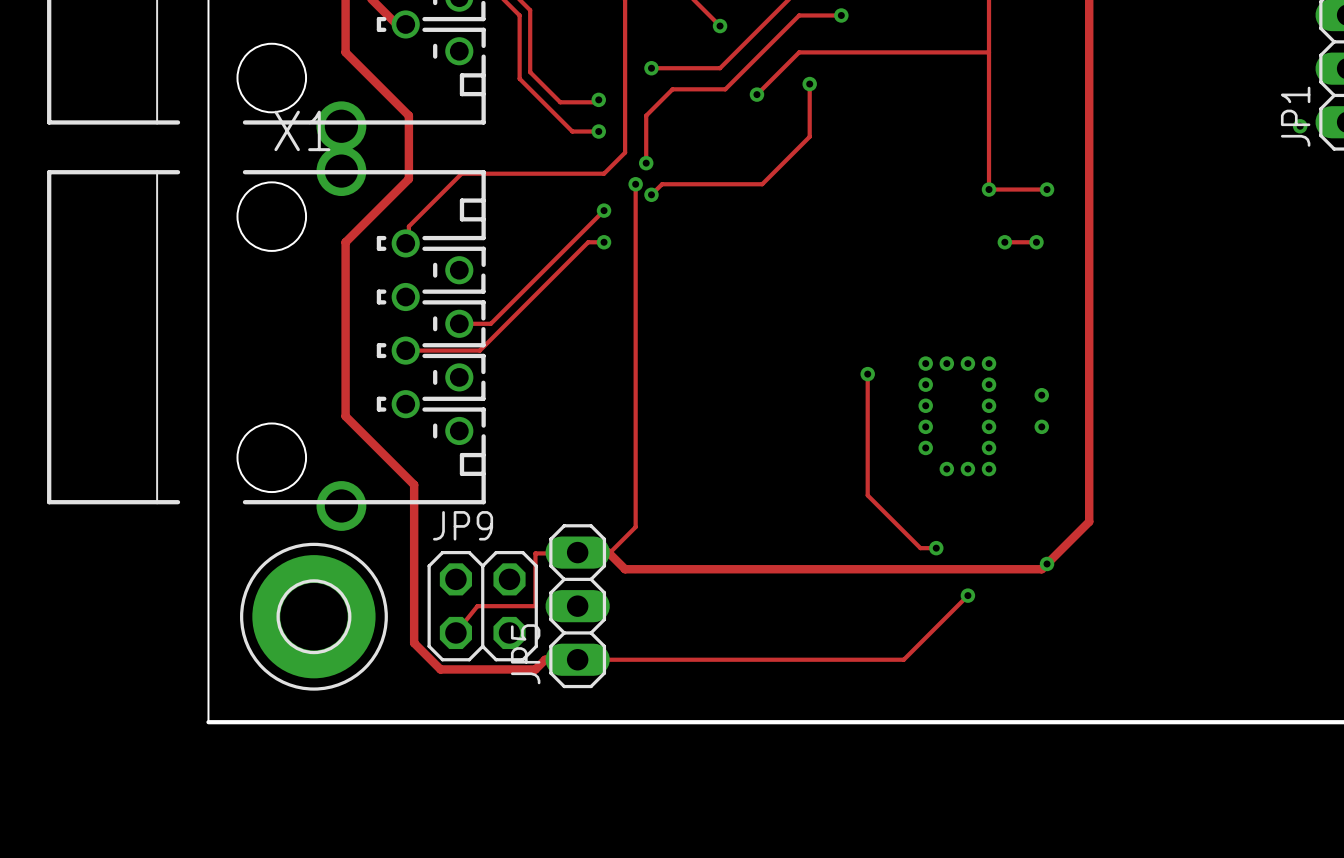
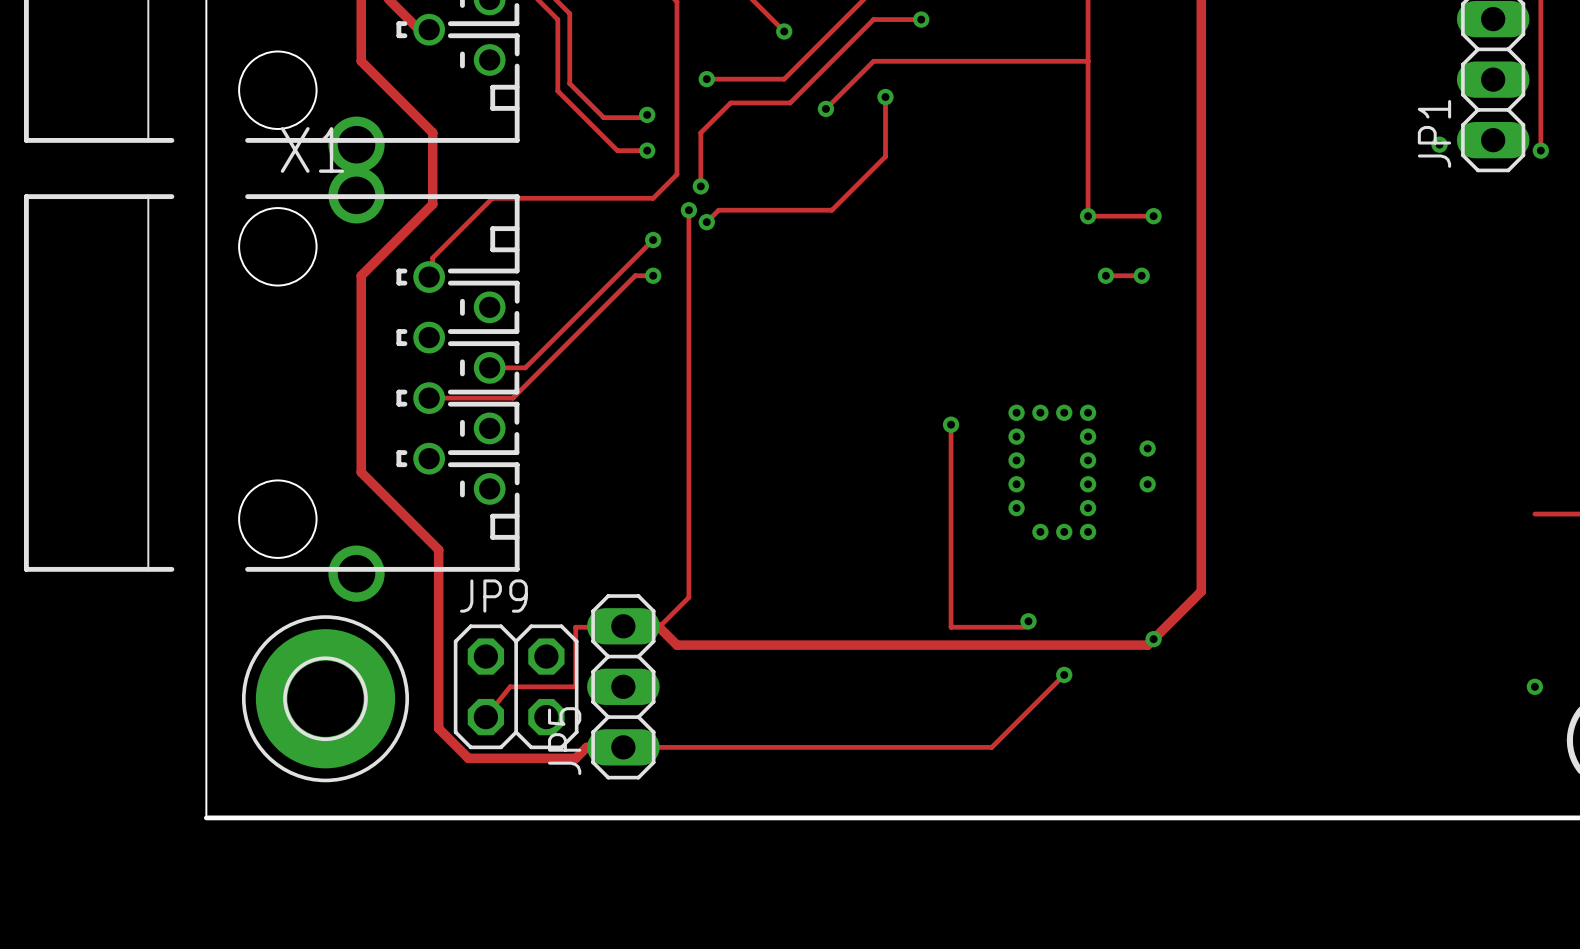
track: (867, 495) (920, 548) (936, 548) -> (951, 561) (951, 627) (1028, 627)

